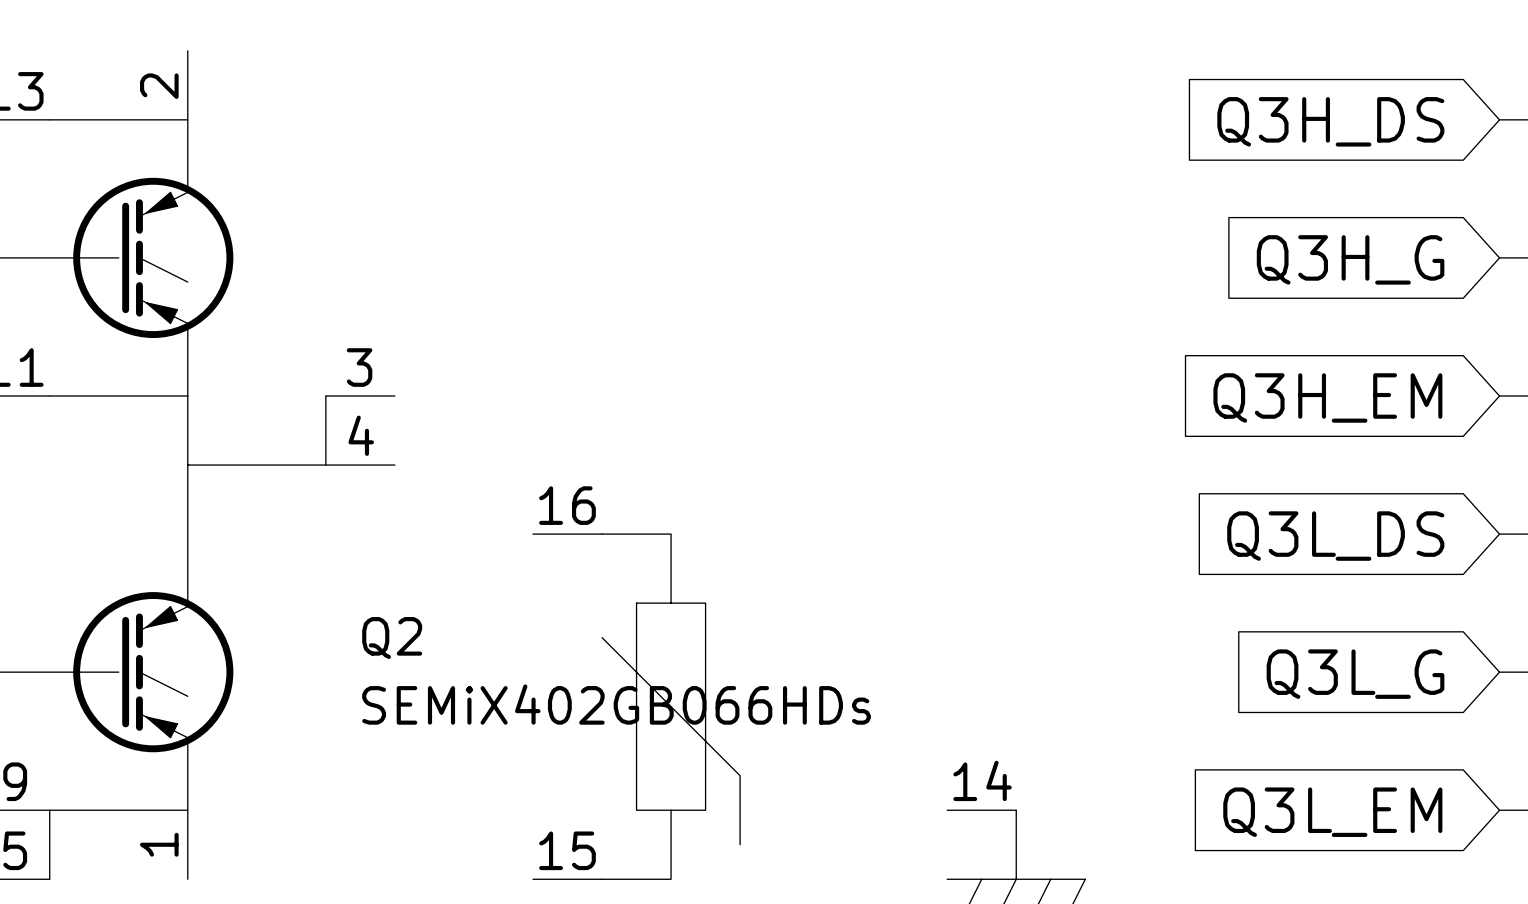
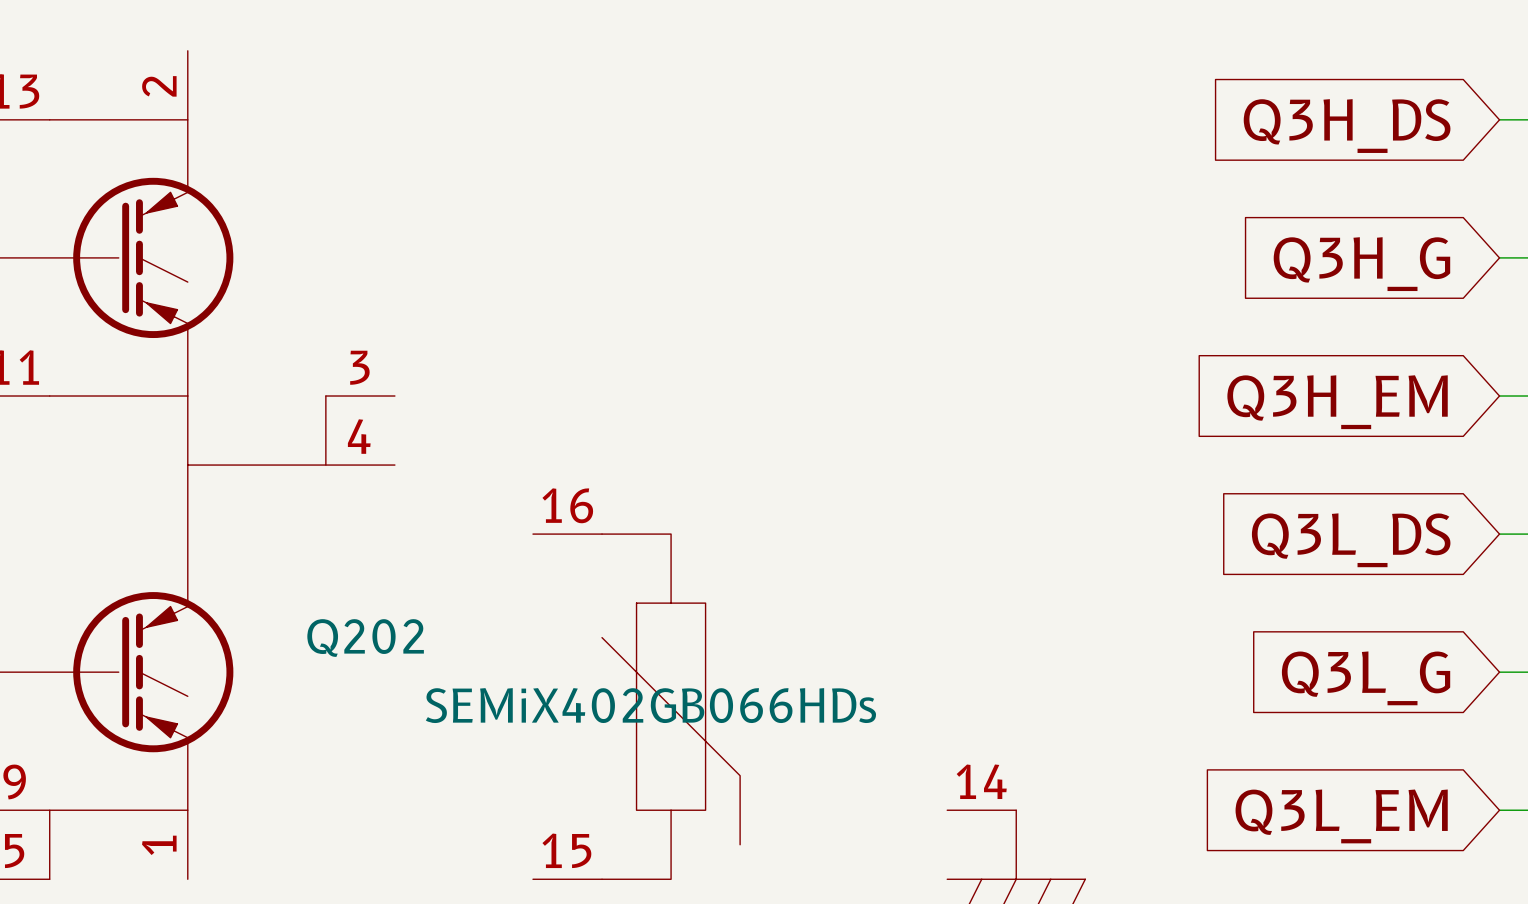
Q2 name: Q2 (392, 637) -> Q202 (365, 638)

